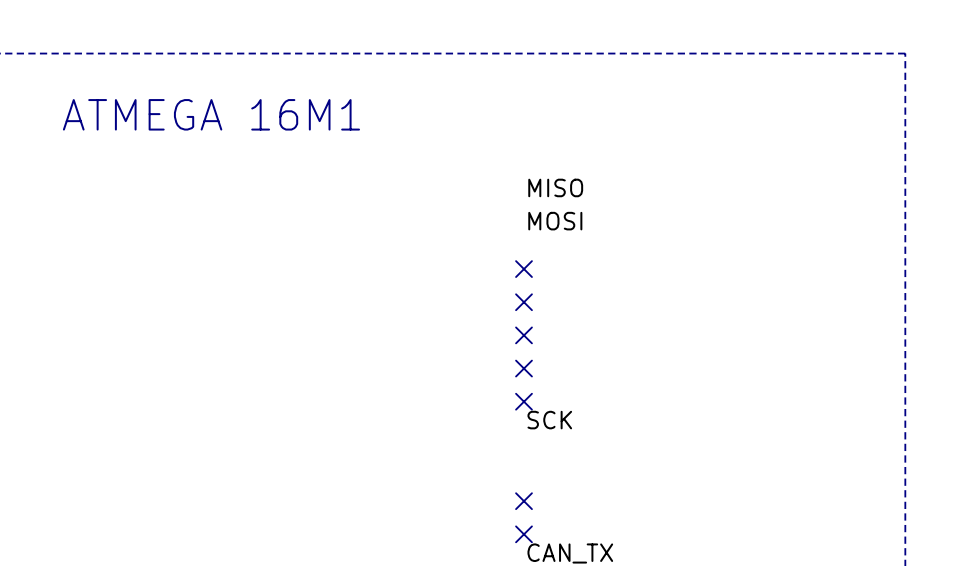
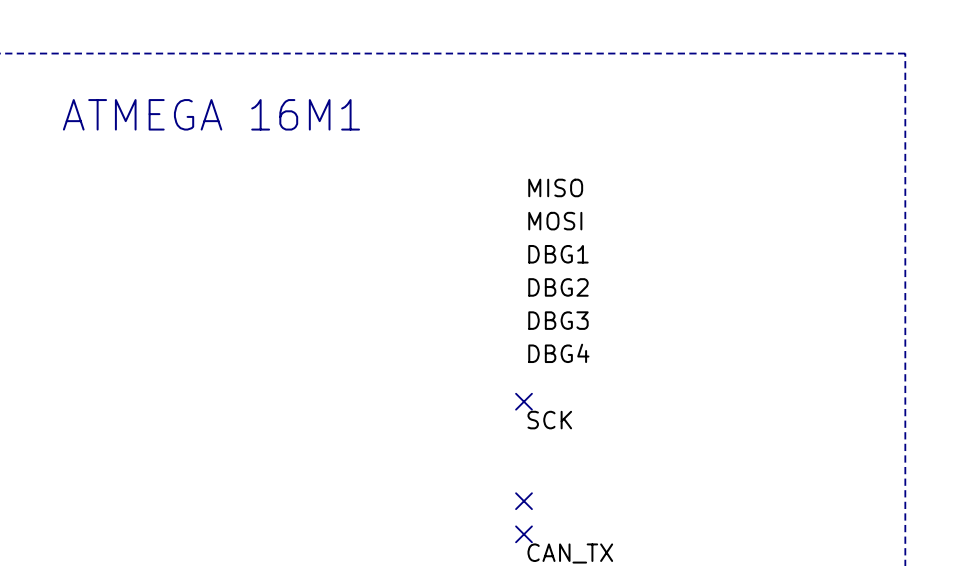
label: none -> DBG1 (558, 254)
no-connect mark: (524, 269) -> none
label: none -> DBG2 (558, 287)
no-connect mark: (524, 302) -> none
label: none -> DBG3 (558, 320)
no-connect mark: (524, 335) -> none
label: none -> DBG4 (558, 353)
no-connect mark: (524, 368) -> none

